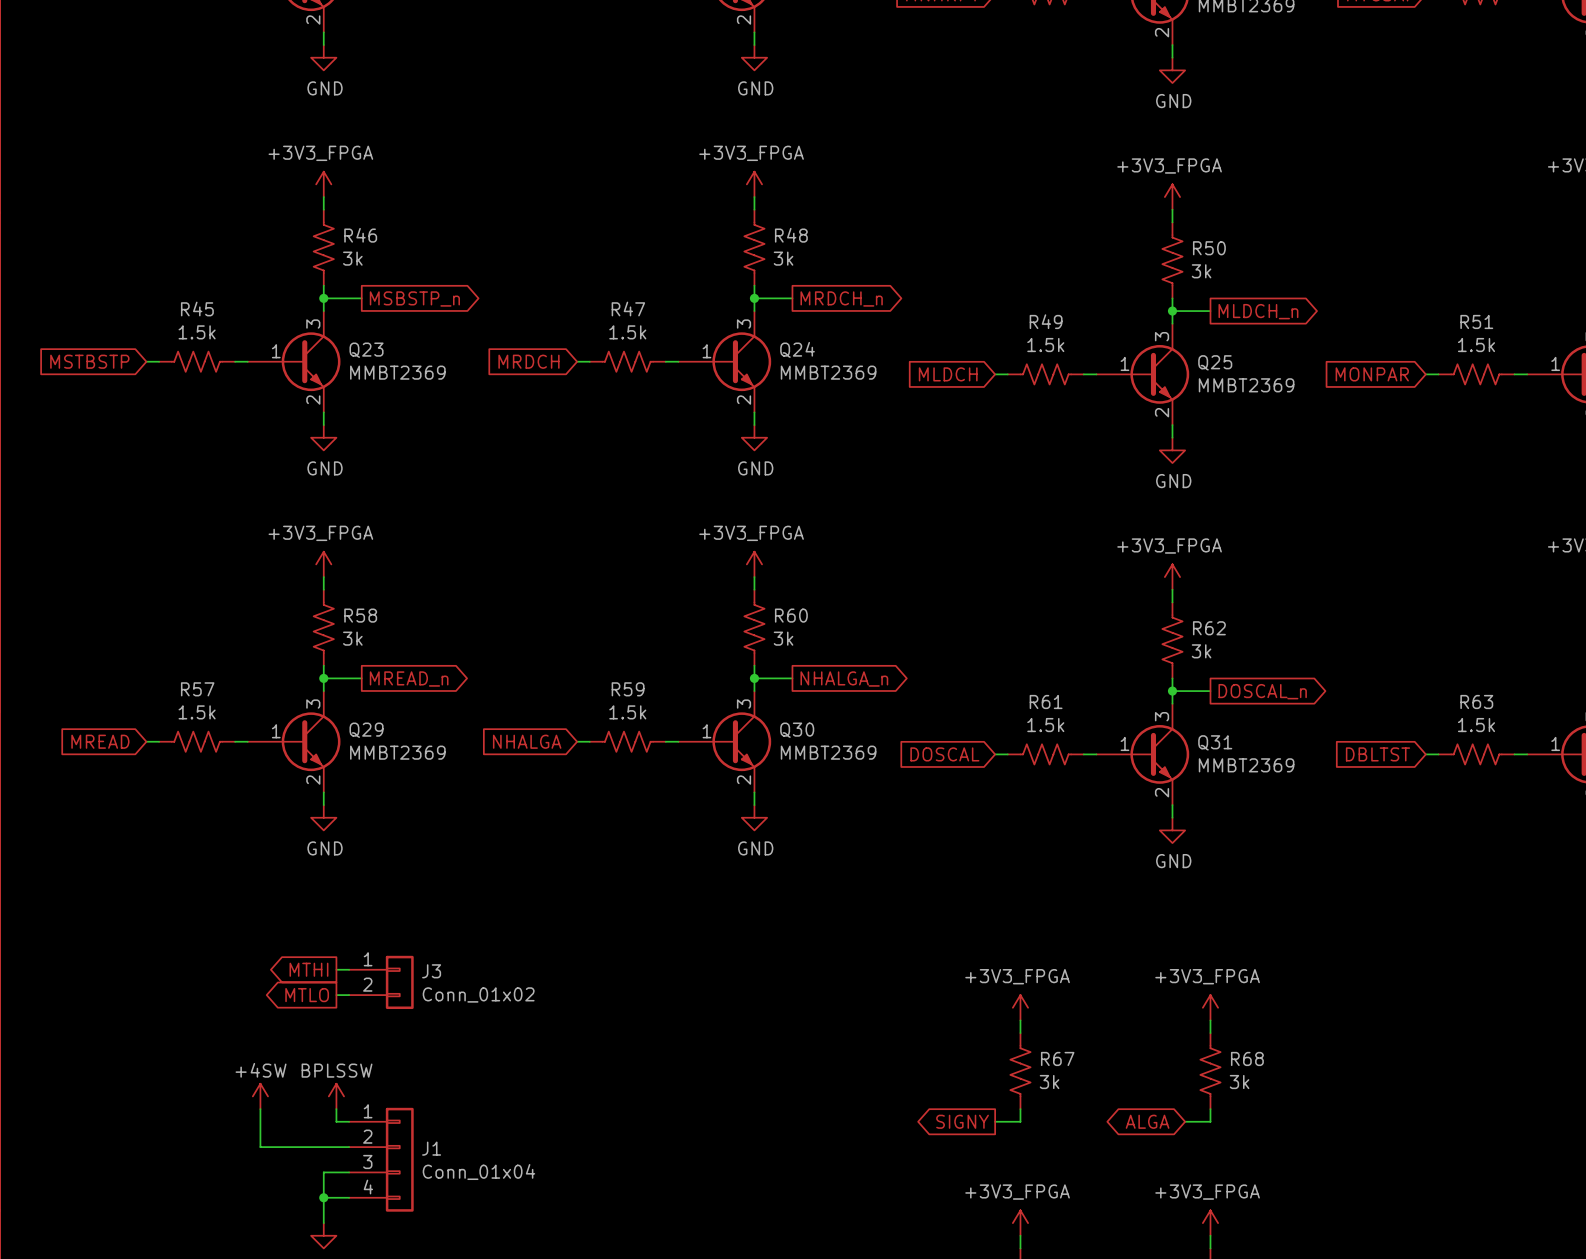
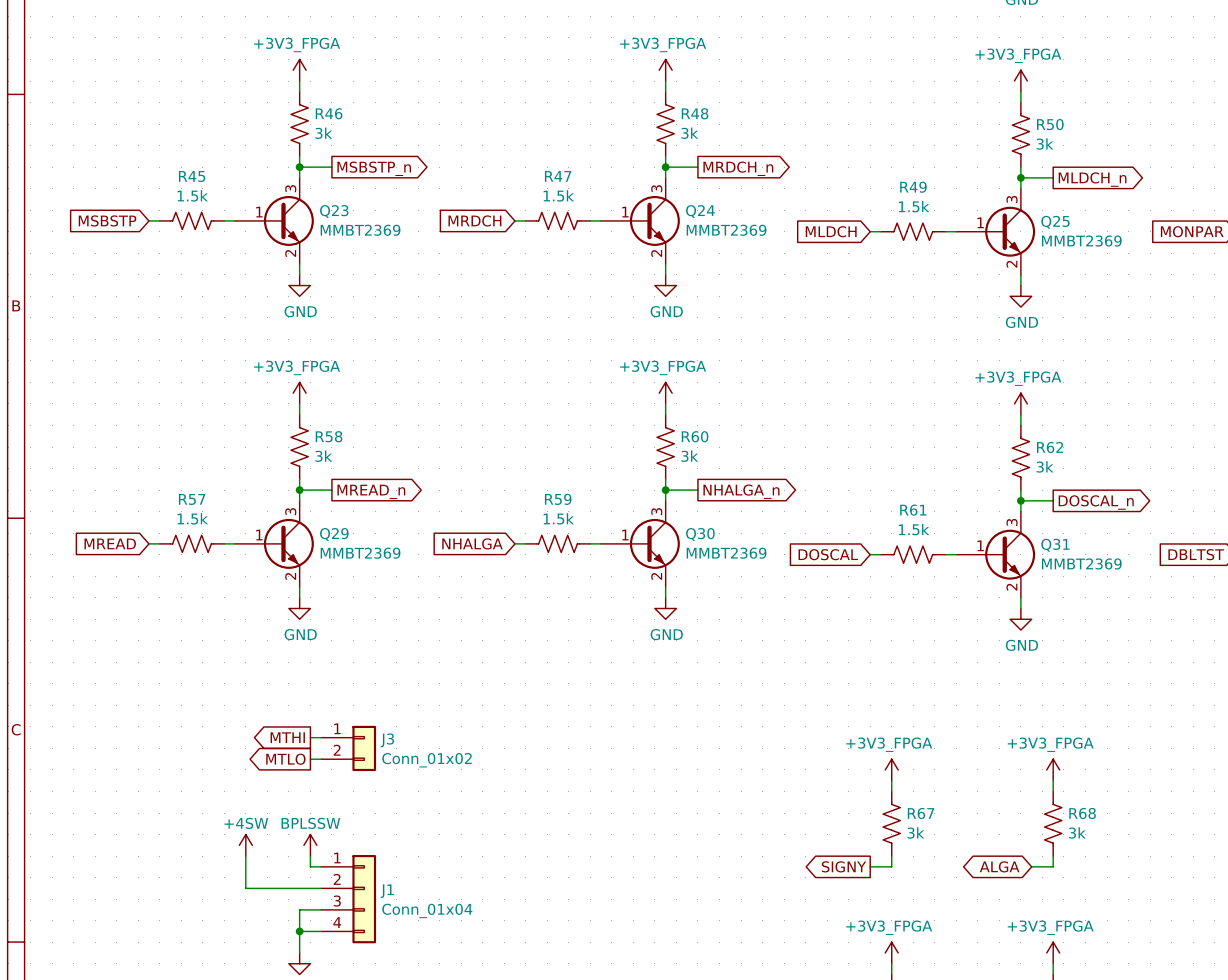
global label: MSTBSTP (89, 361) -> MSBSTP (107, 220)

